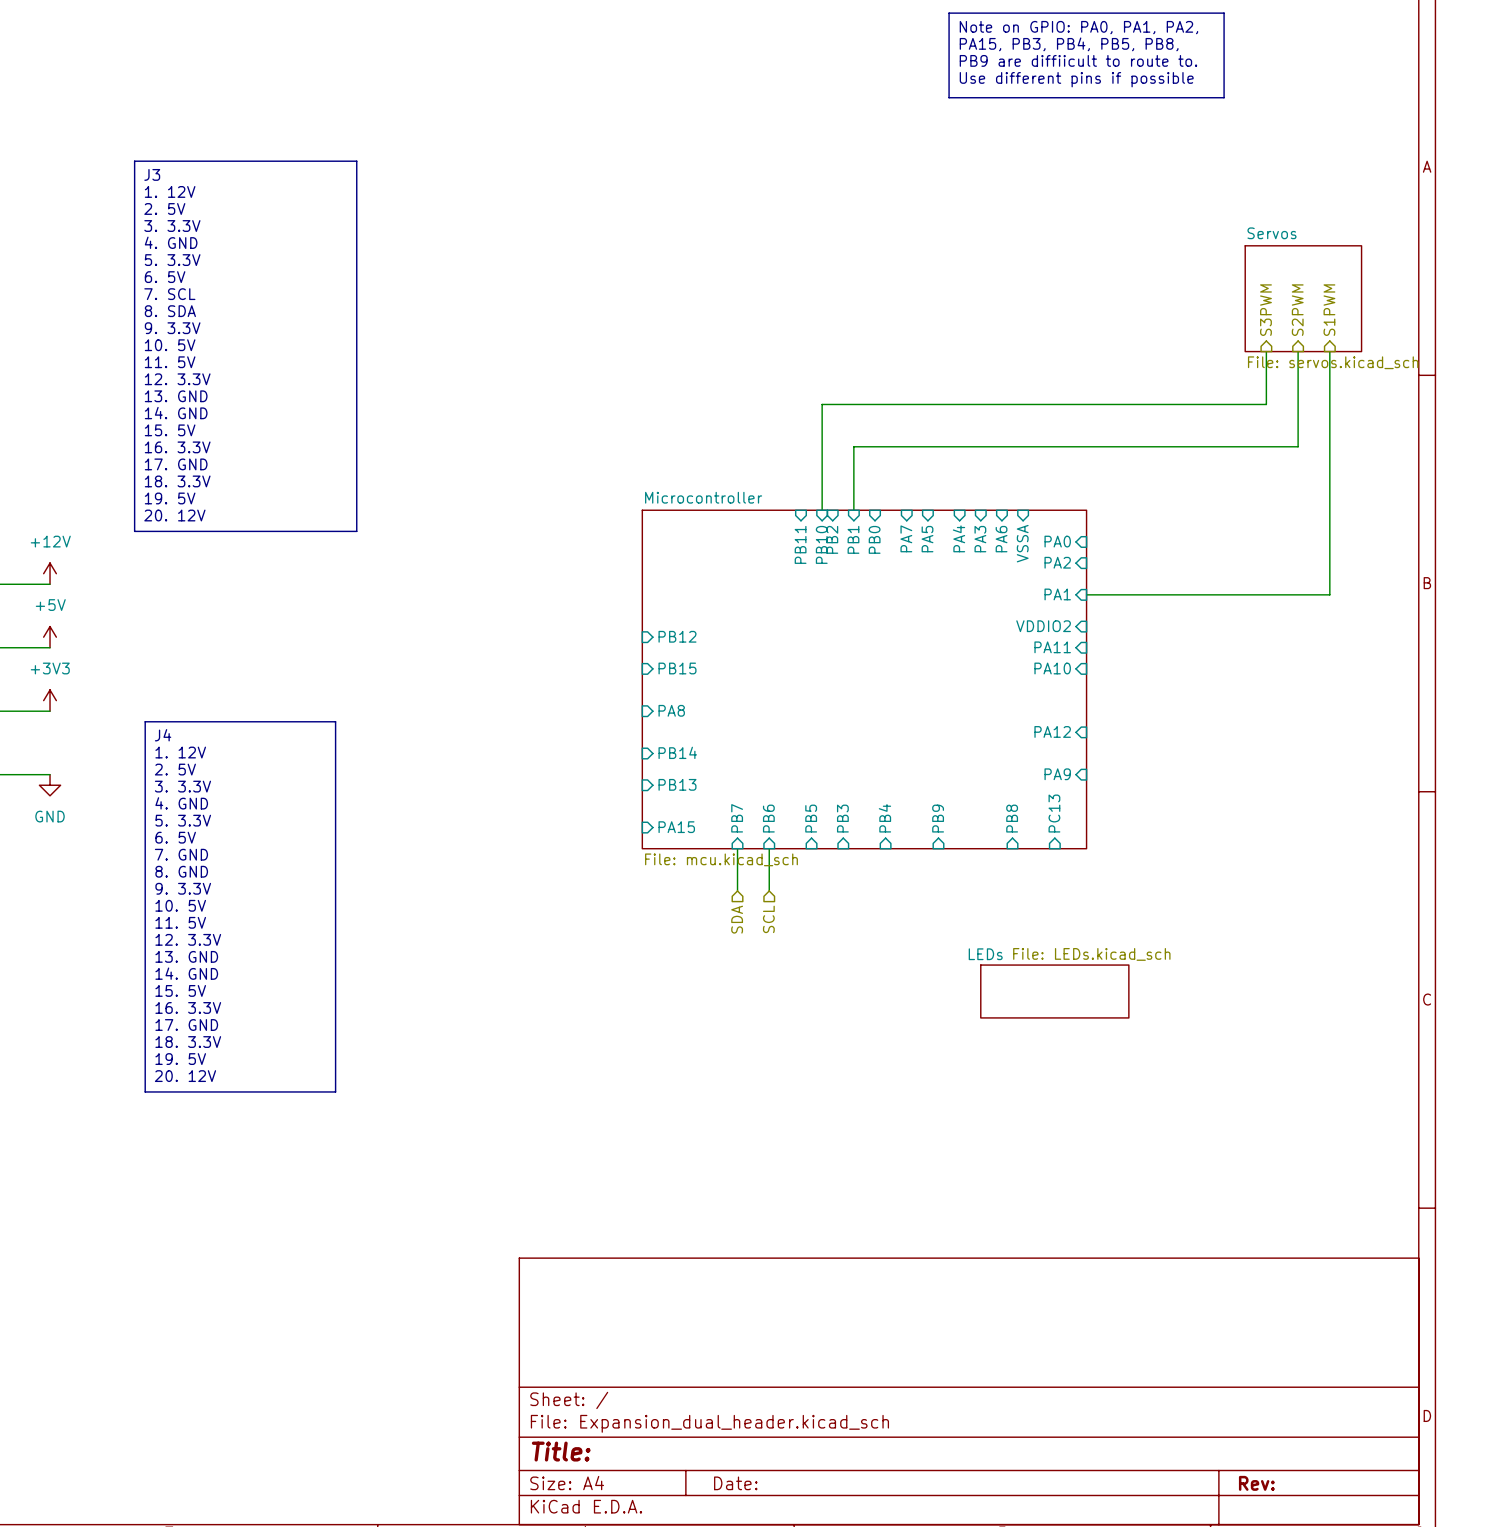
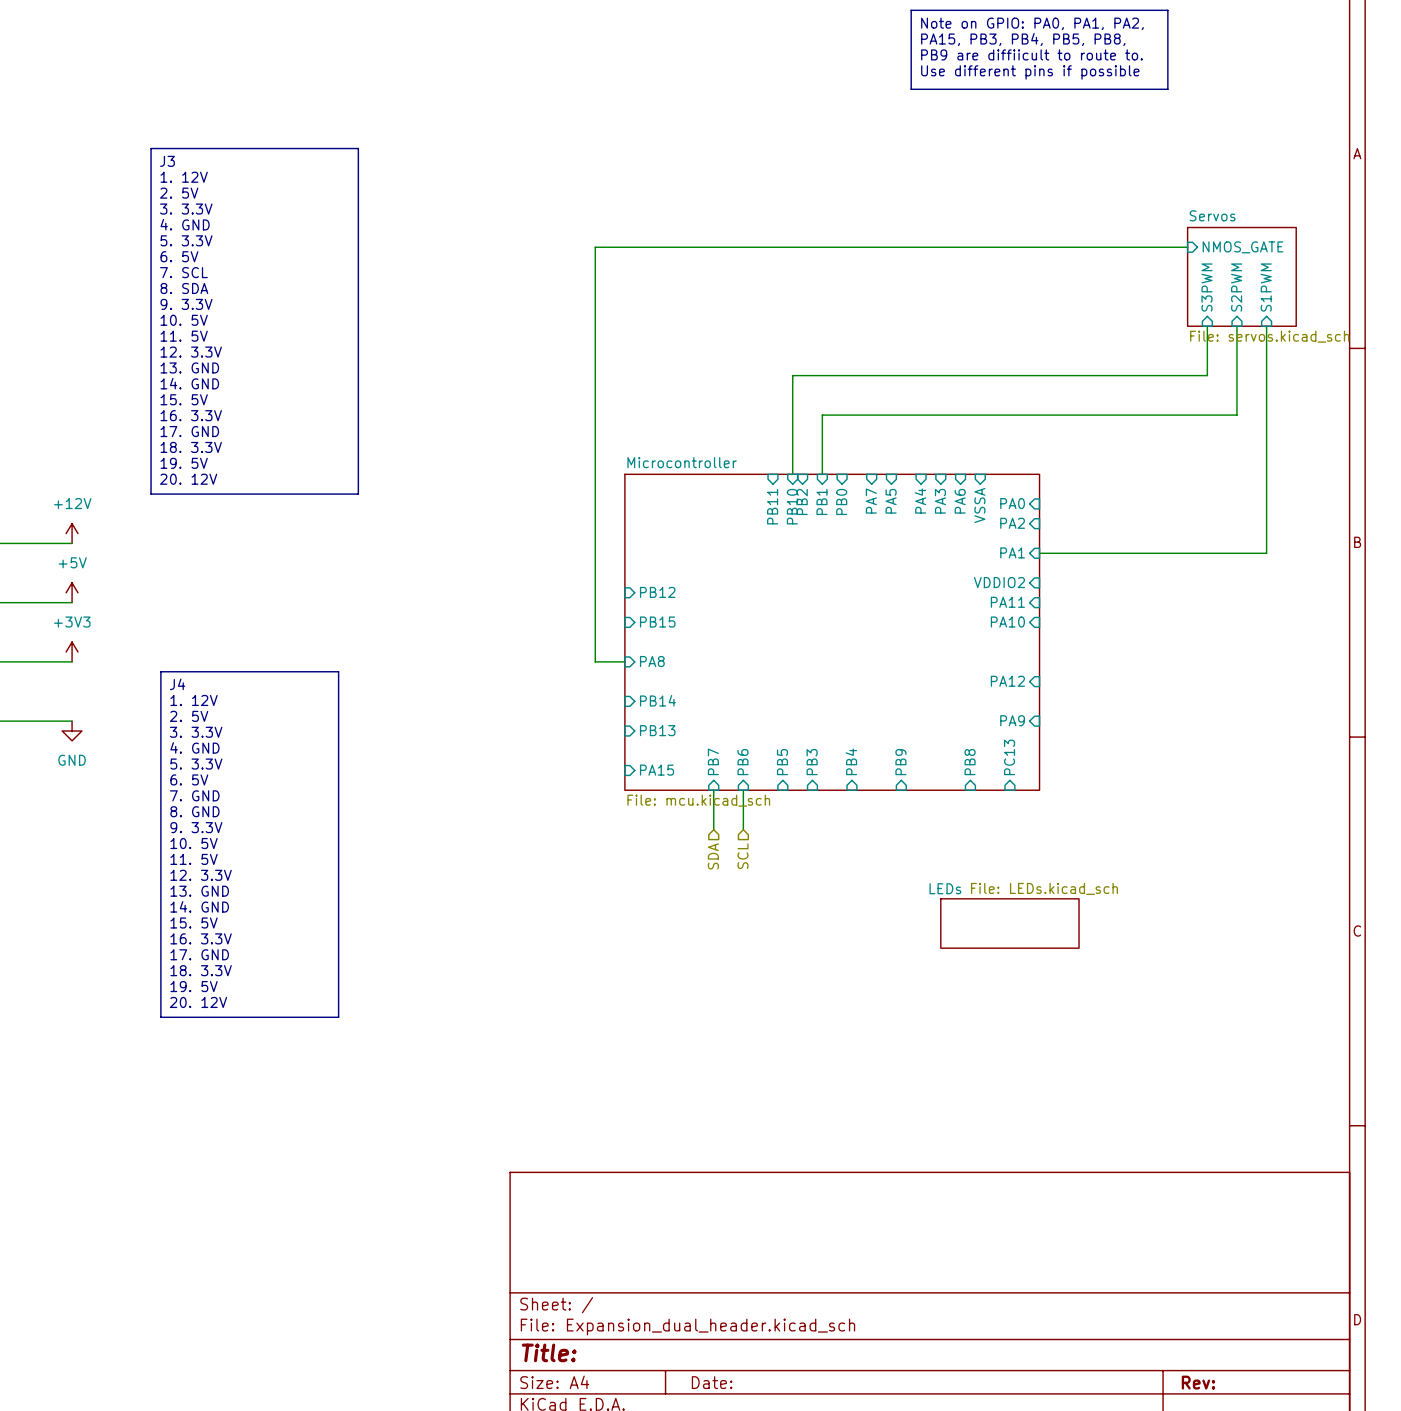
wire: none -> (1187, 247) (595, 247) (595, 661) (624, 661)
sheet pin: none -> NMOS_GATE (1243, 247)
hierarchical label: S3PWM (1265, 310) -> none
sheet pin: none -> S3PWM (1206, 287)
hierarchical label: S2PWM (1297, 310) -> none
sheet pin: none -> S2PWM (1236, 287)
hierarchical label: S1PWM (1329, 310) -> none
sheet pin: none -> S1PWM (1266, 287)

